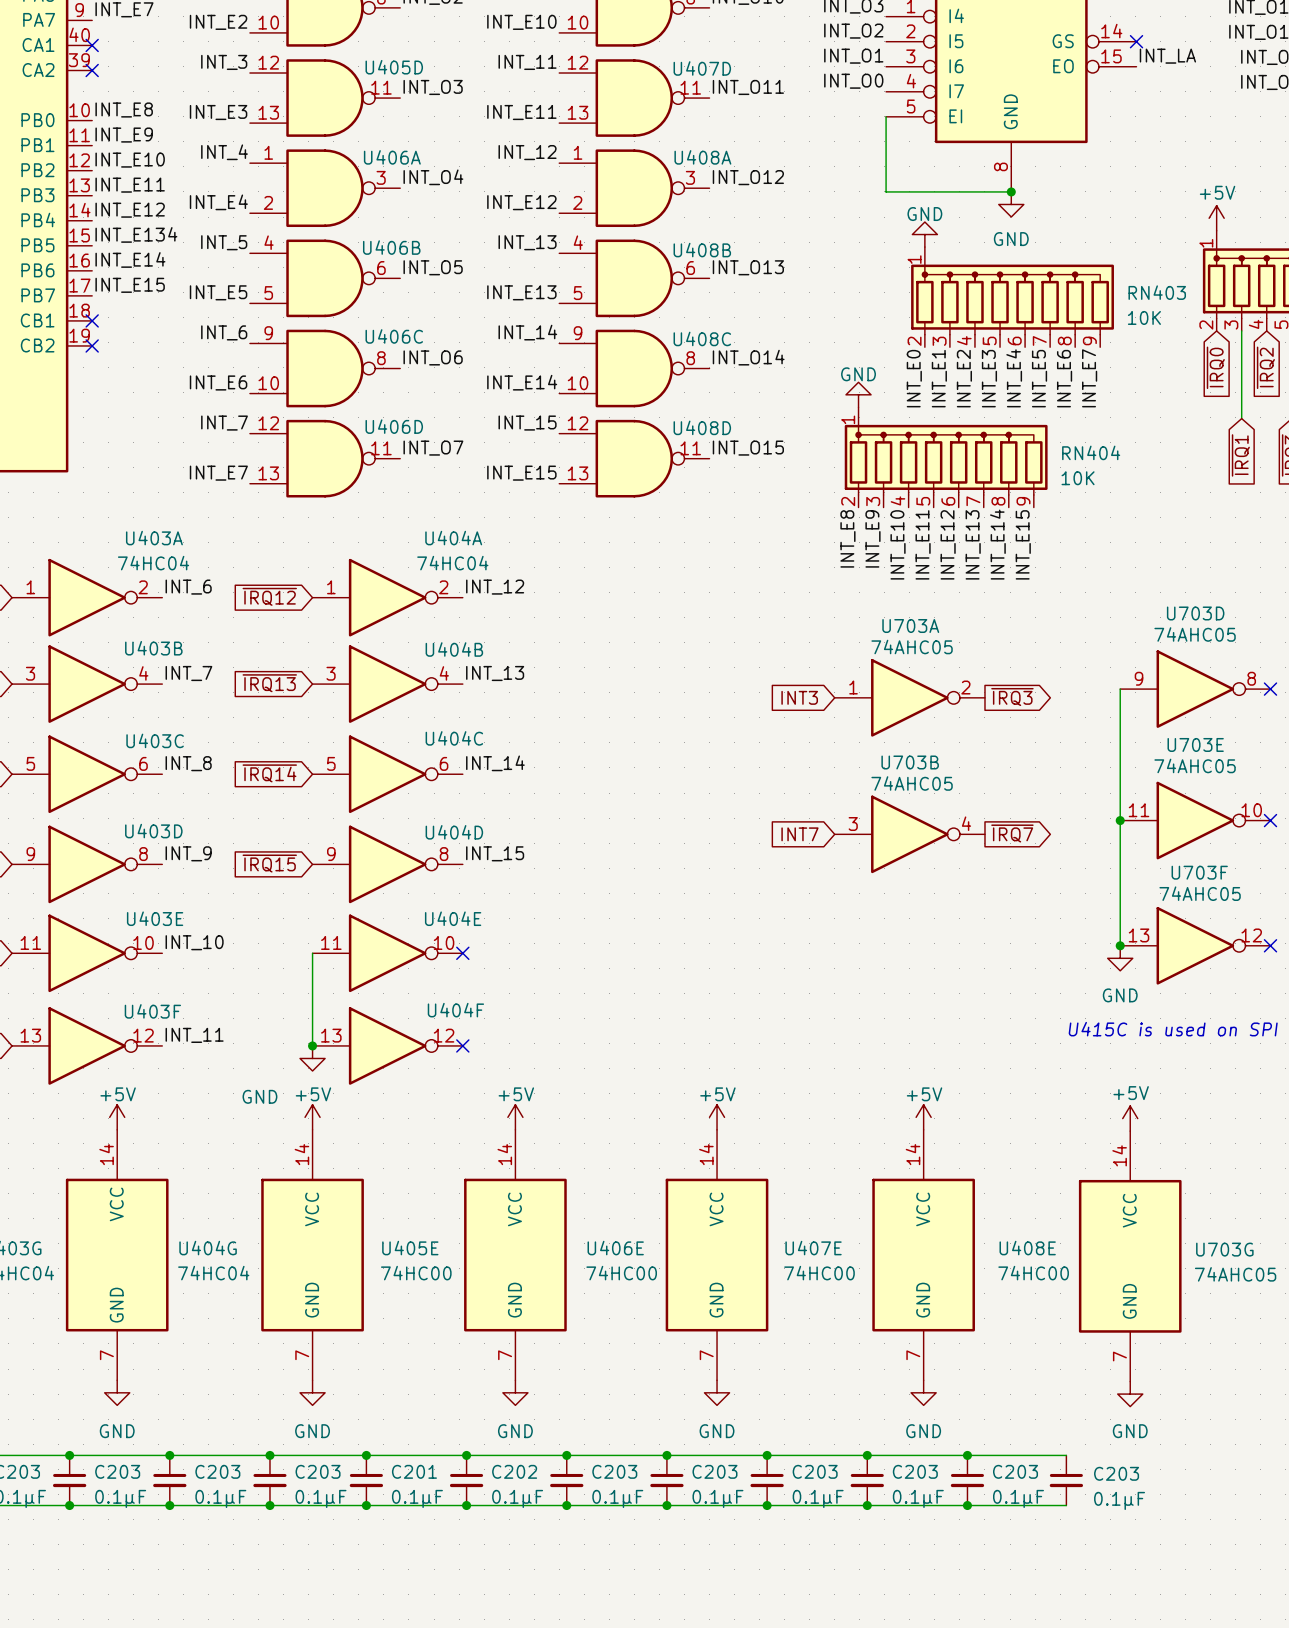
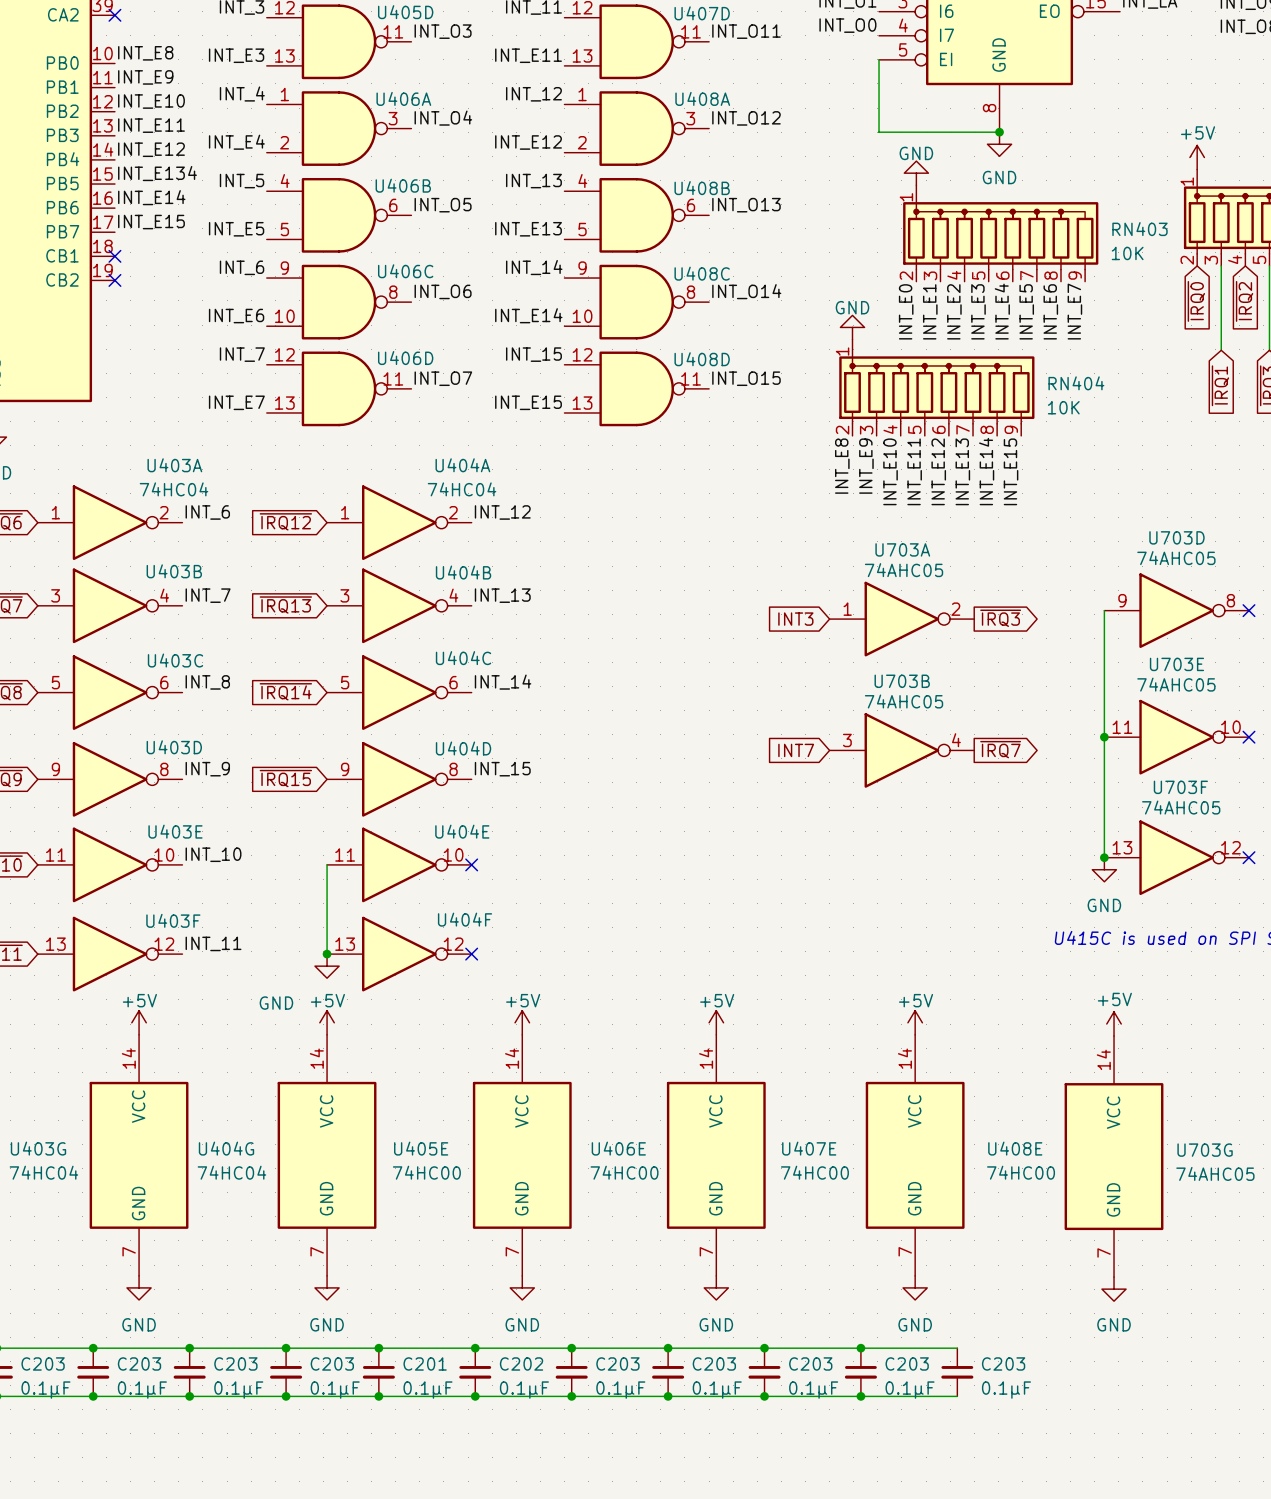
wire: (967, 1455) (1066, 1455) -> none
junction: (967, 1455) -> none
C203: 0.1µF (1066, 1480) -> none
wire: (967, 1505) (1066, 1505) -> none
junction: (967, 1505) -> none

